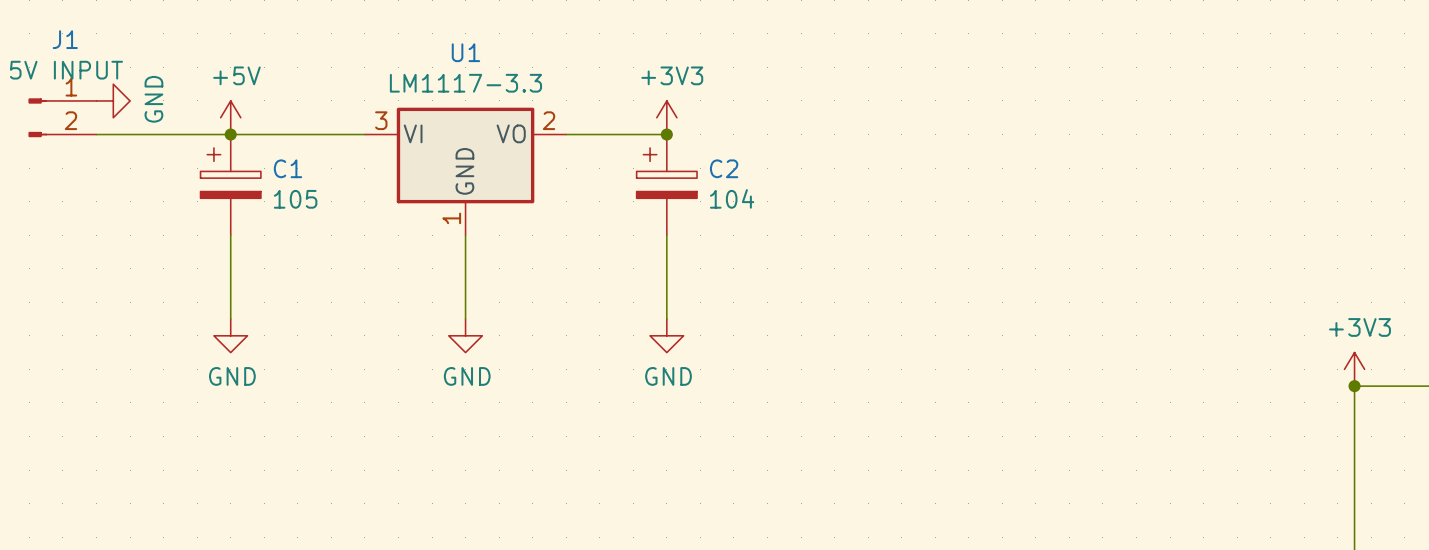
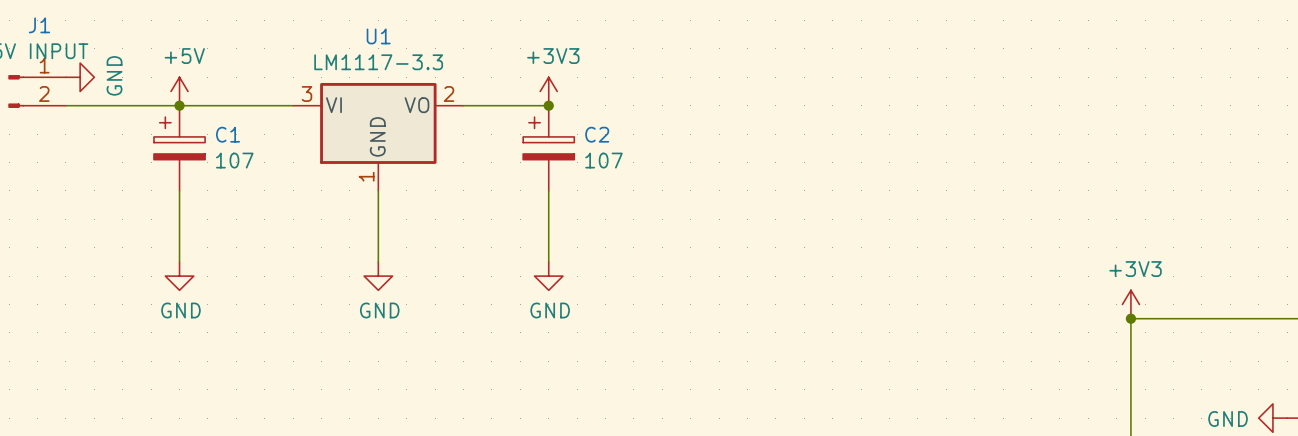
C2 value: 104 (732, 198) -> 107 (603, 160)
C1 value: 105 (295, 199) -> 107 (234, 160)

